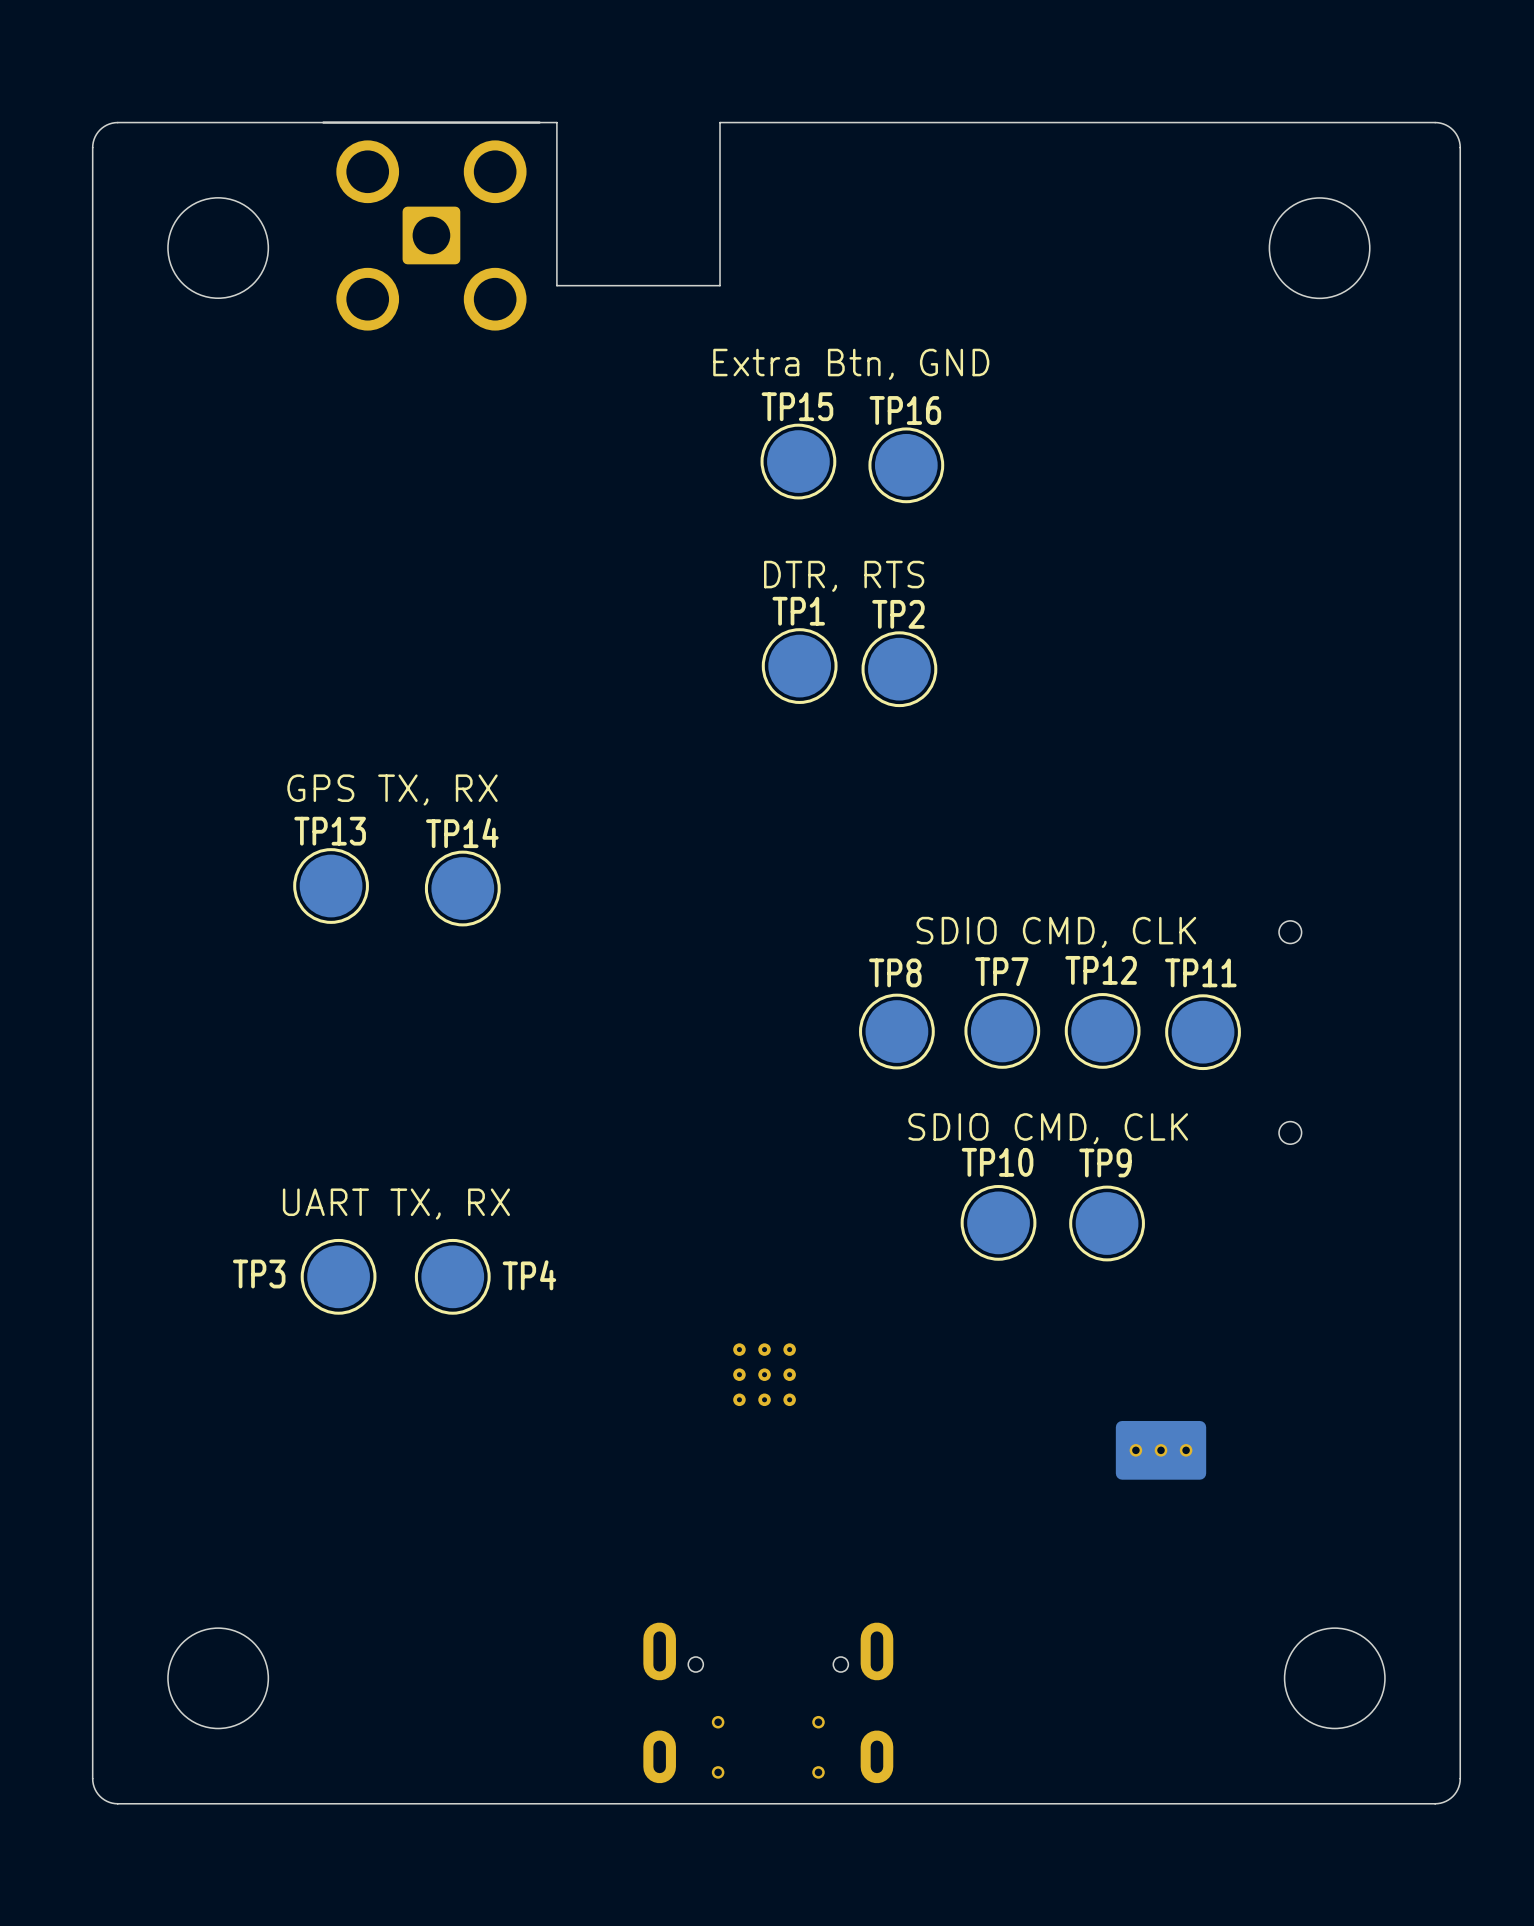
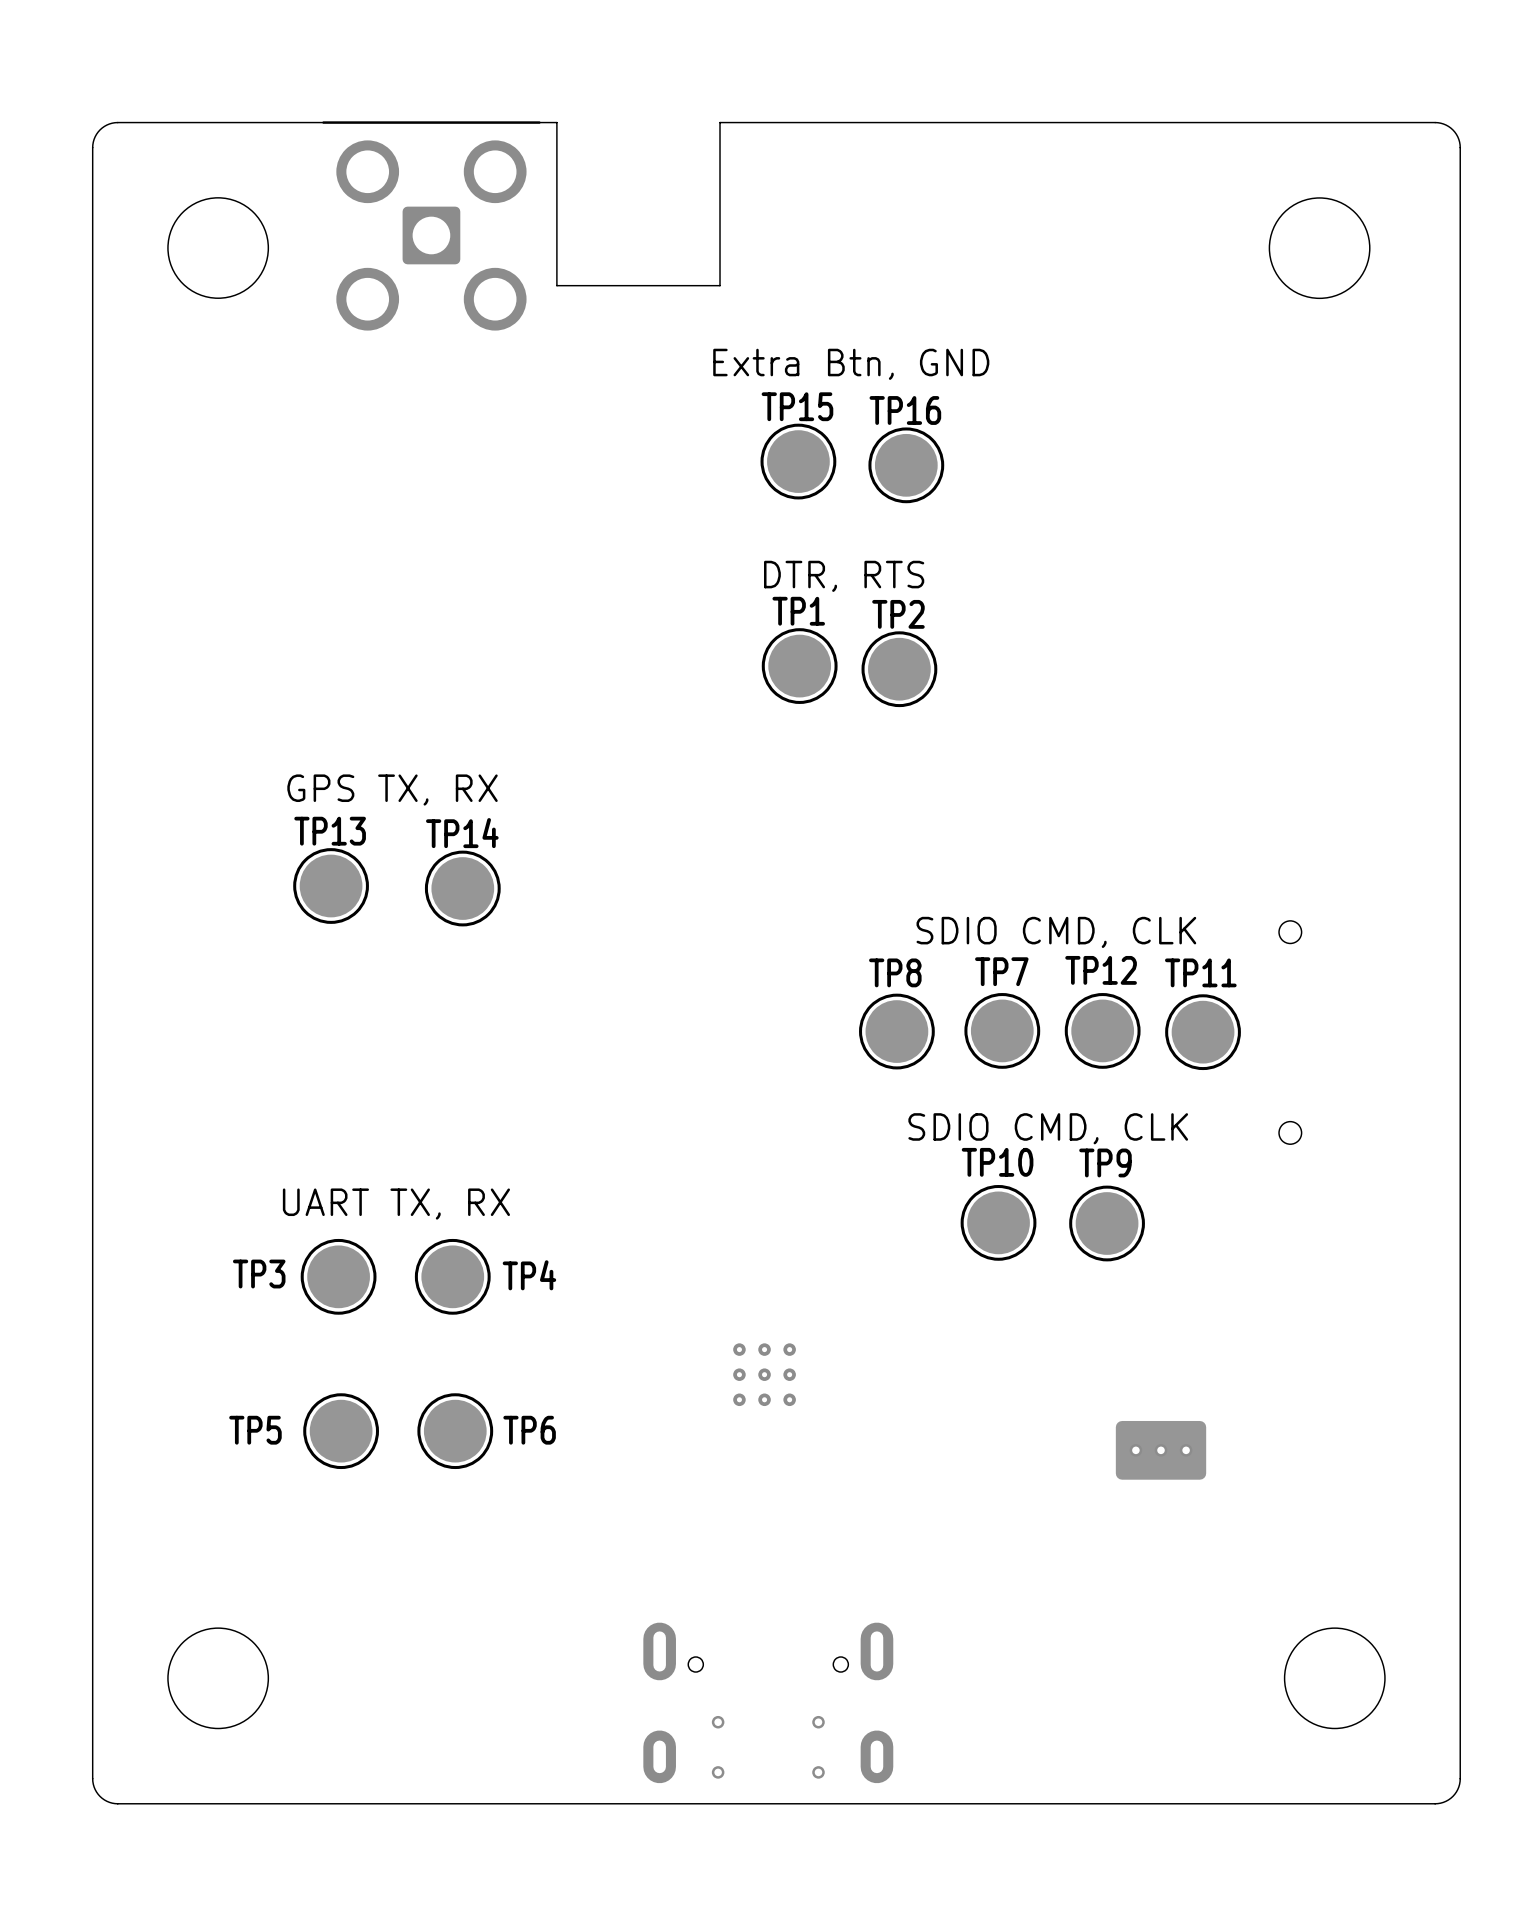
TP5: none -> (341, 1431)
TP6: none -> (455, 1431)

